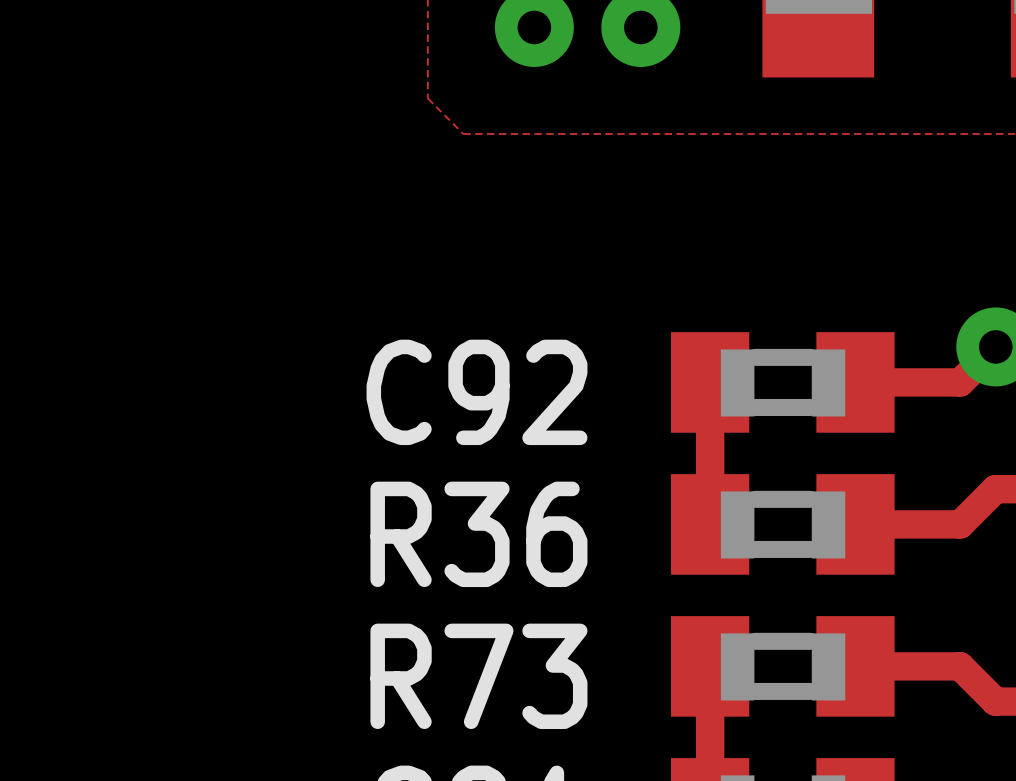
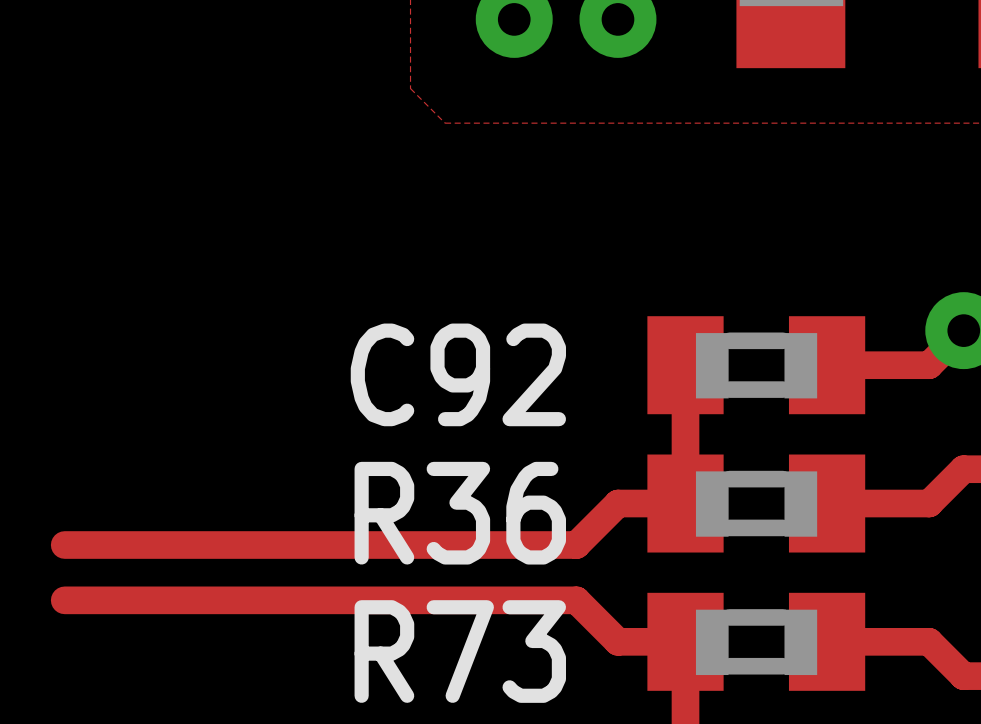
track: none -> (685, 503) (617, 503) (576, 545) (64, 545)
track: none -> (64, 600) (576, 600) (617, 641) (685, 641)

